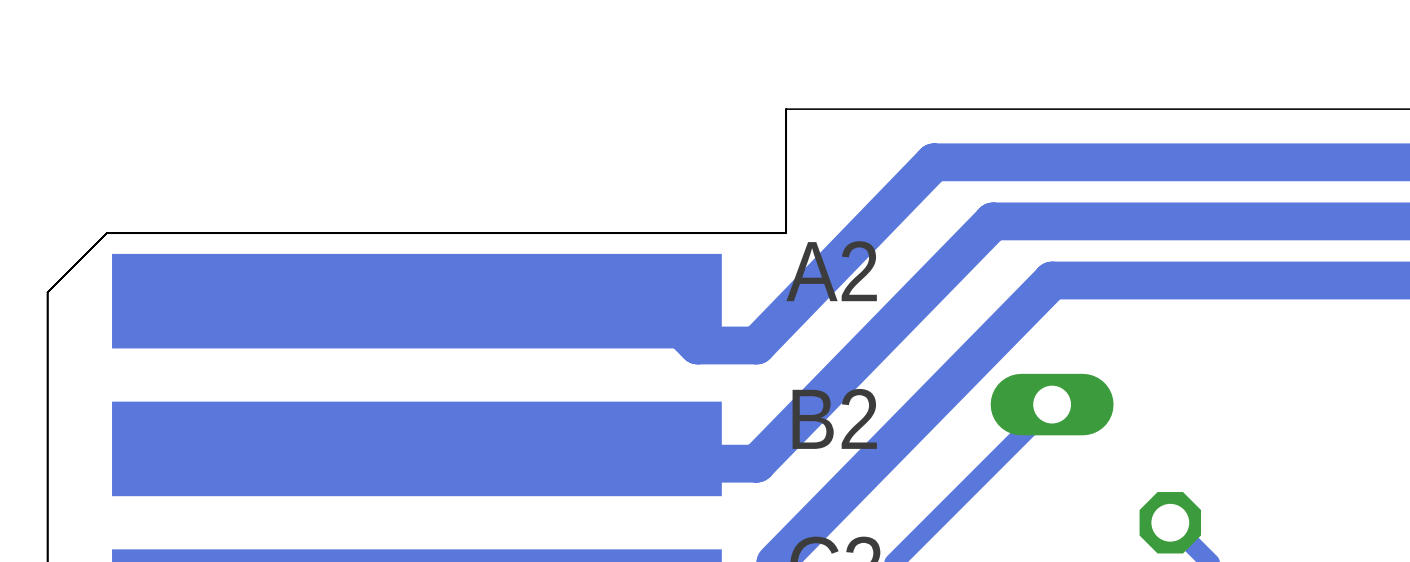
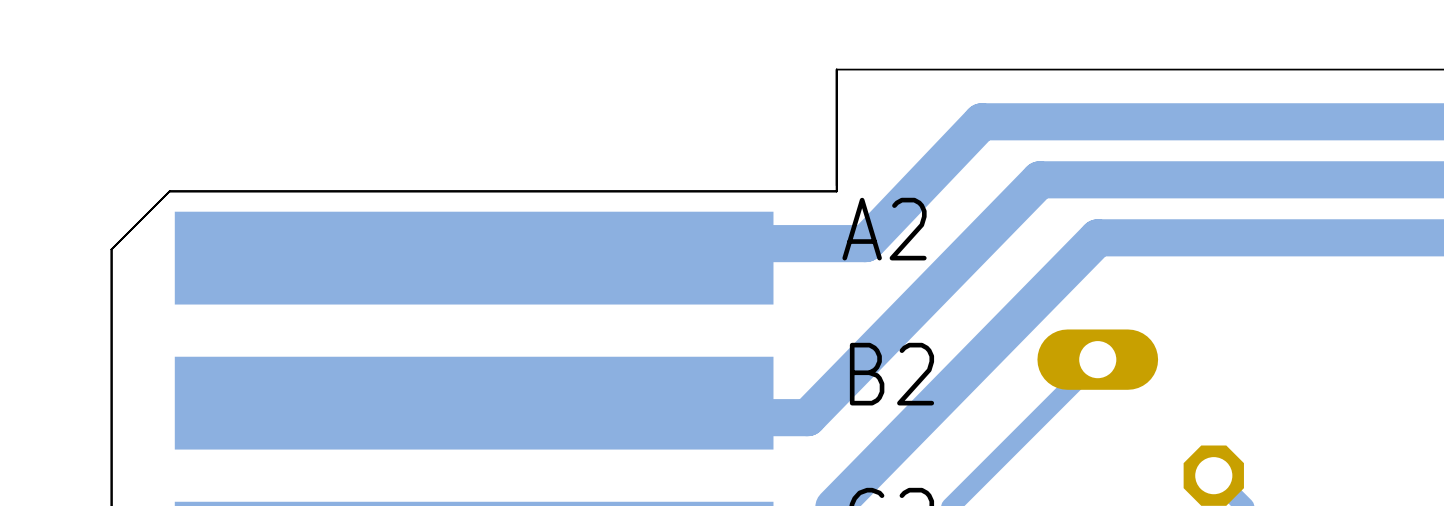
track: (933, 162) (756, 345) (697, 345) (656, 304) -> (981, 121) (865, 243) (749, 243) (709, 261)

